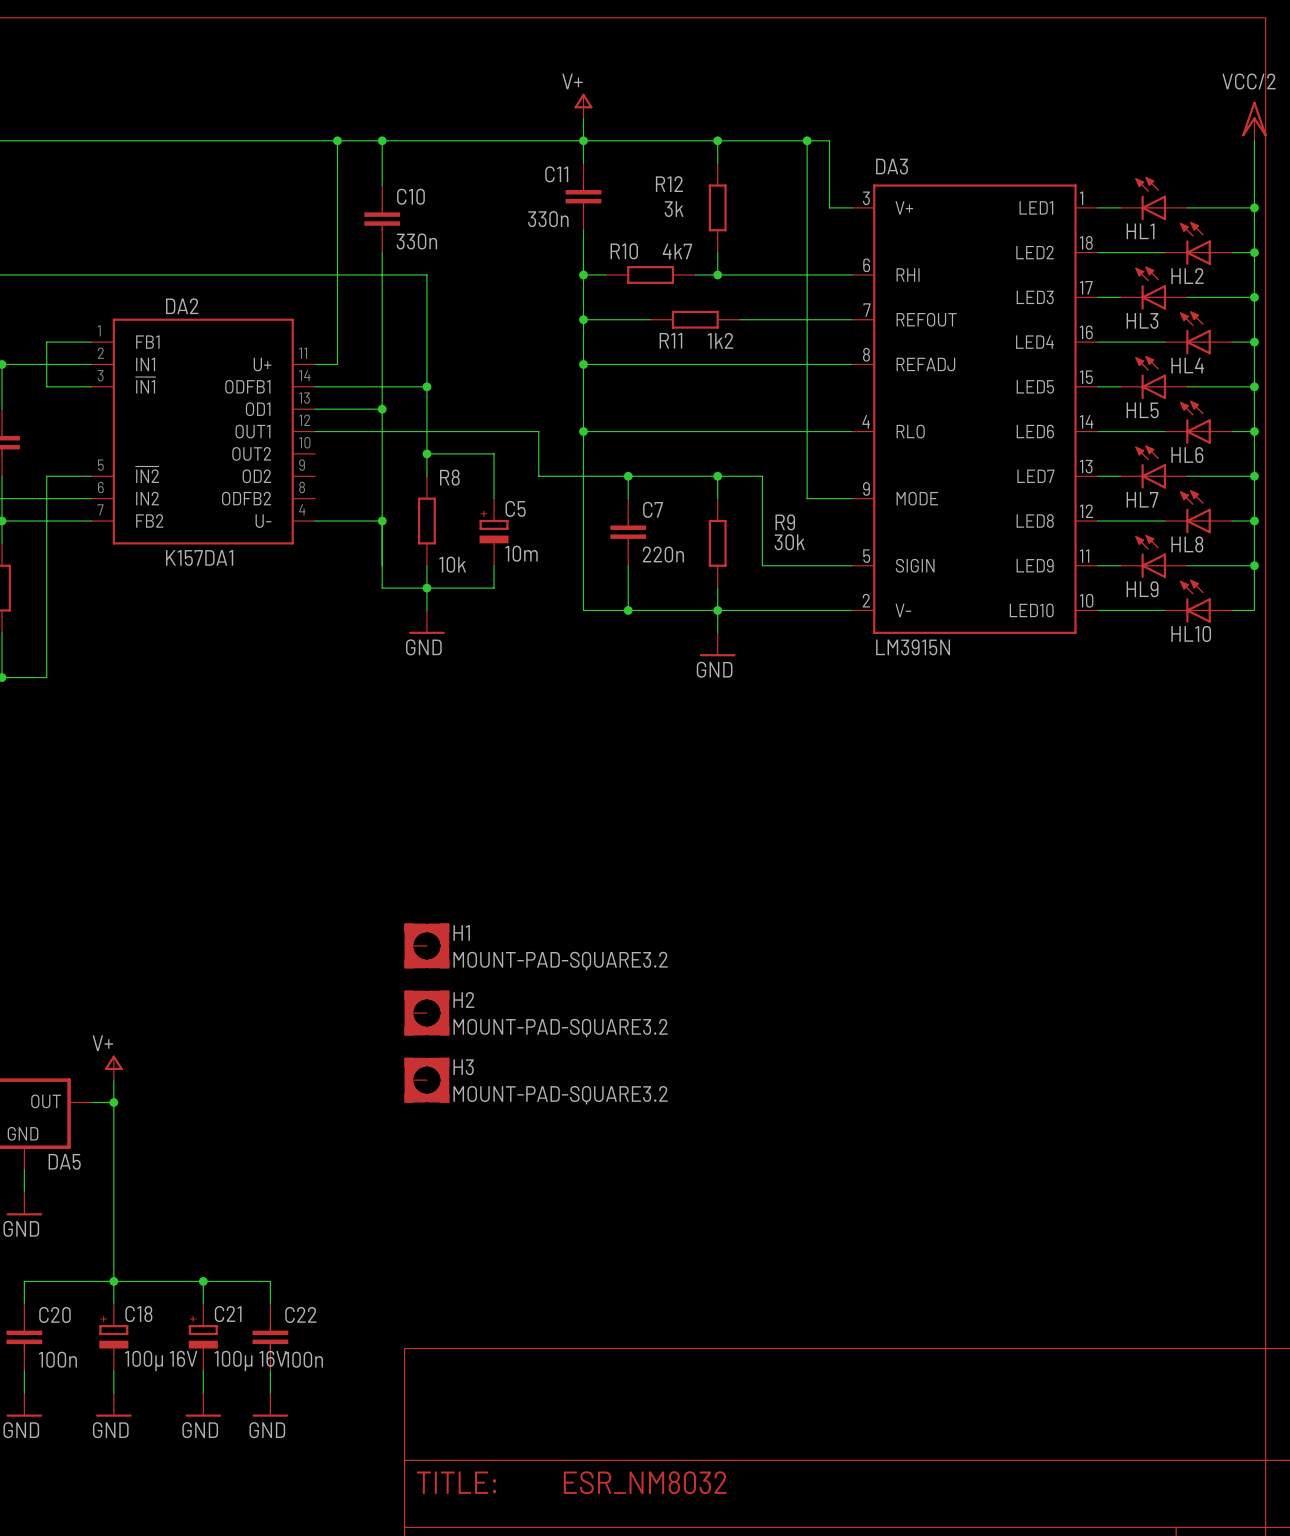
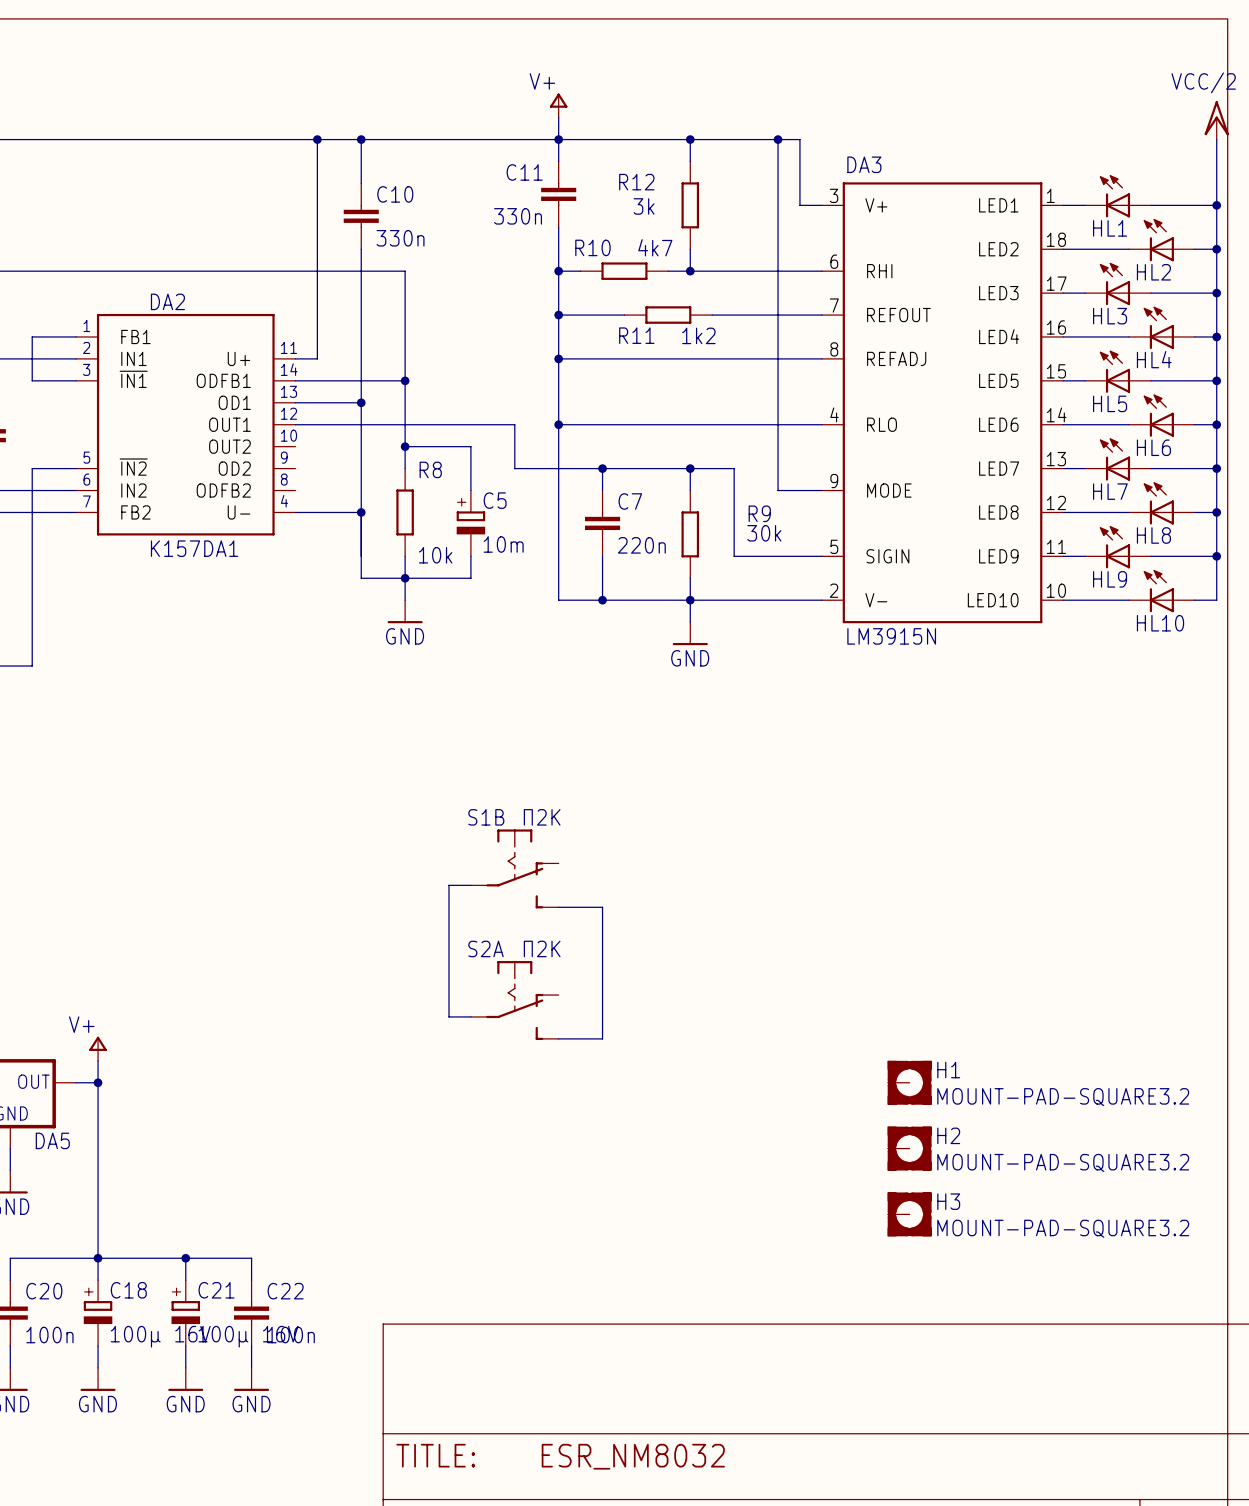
S1B: none -> П2К (514, 868)
wire: none -> (470, 885) (448, 885) (448, 1016) (470, 1016)
wire: none -> (558, 907) (602, 907) (602, 1038) (558, 1038)
H1 position: (426, 945) -> (909, 1082)
H2 position: (426, 1013) -> (909, 1148)
S2A: none -> П2К (514, 1000)
H3 position: (426, 1080) -> (909, 1214)

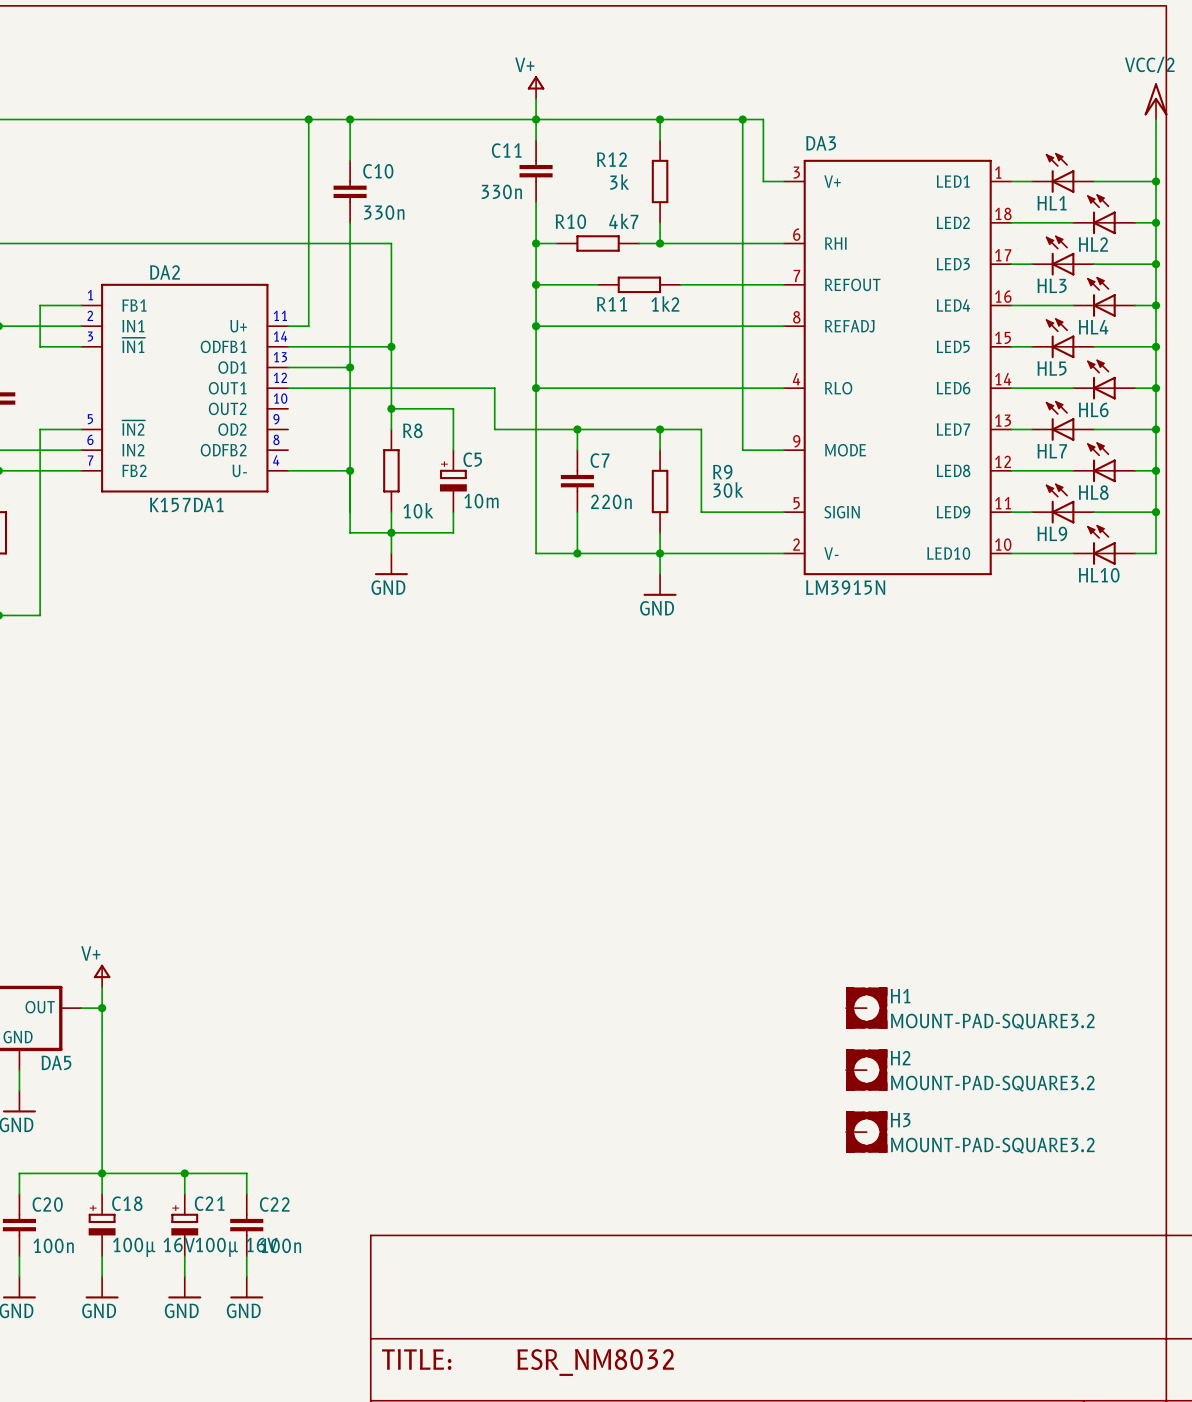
S1B: П2К (514, 868) -> none
wire: (470, 885) (448, 885) (448, 1016) (470, 1016) -> none
wire: (558, 907) (602, 907) (602, 1038) (558, 1038) -> none
S2A: П2К (514, 1000) -> none

